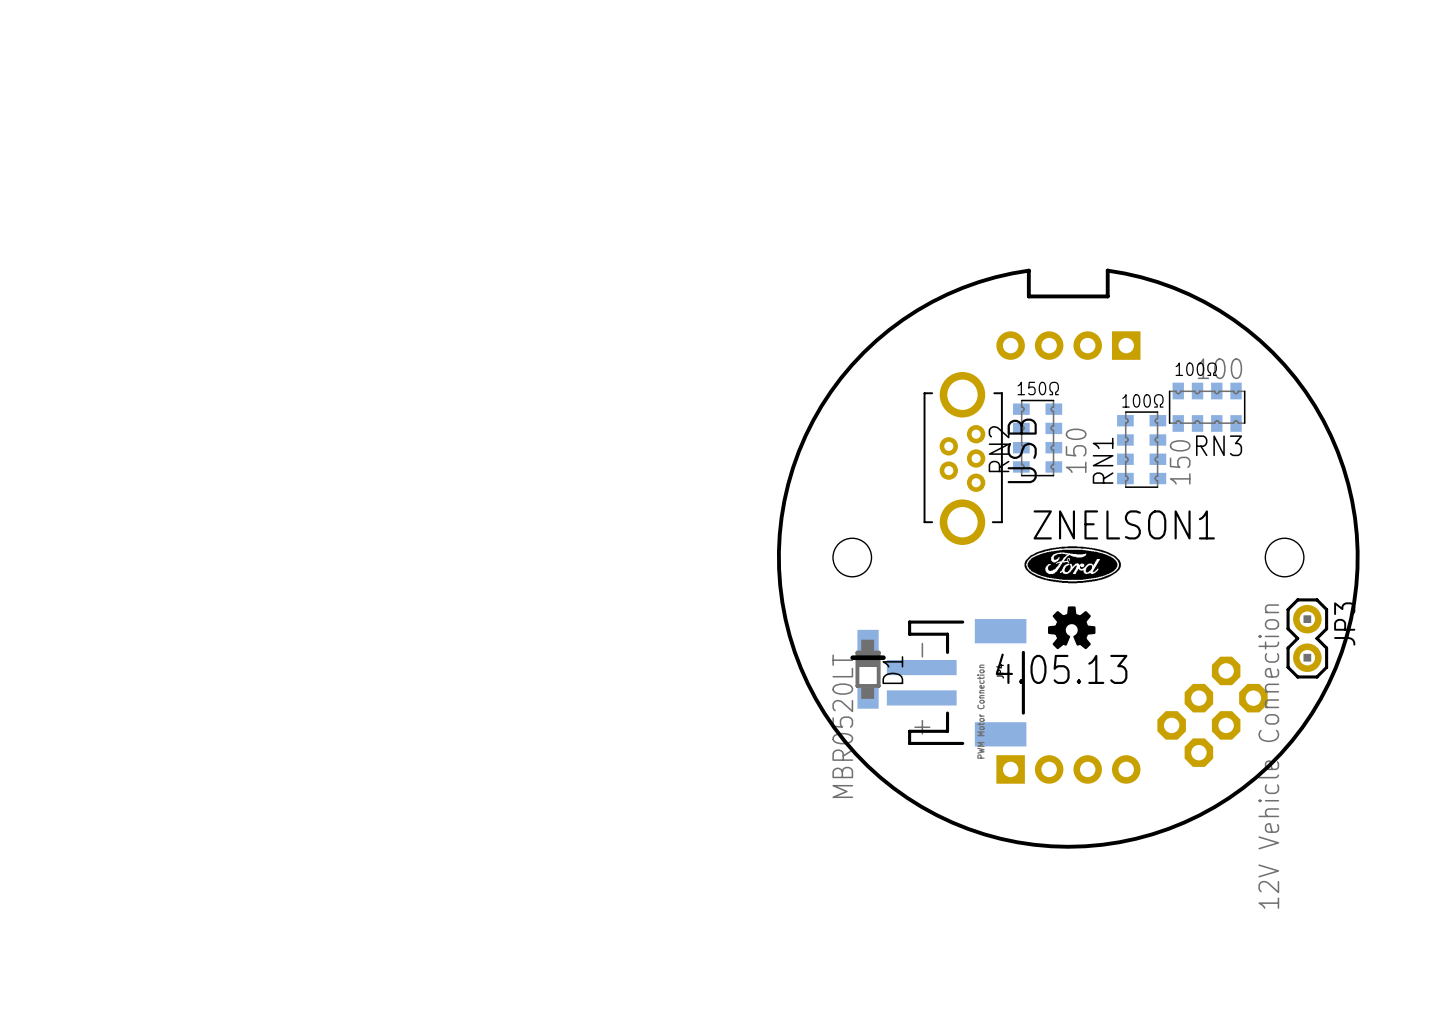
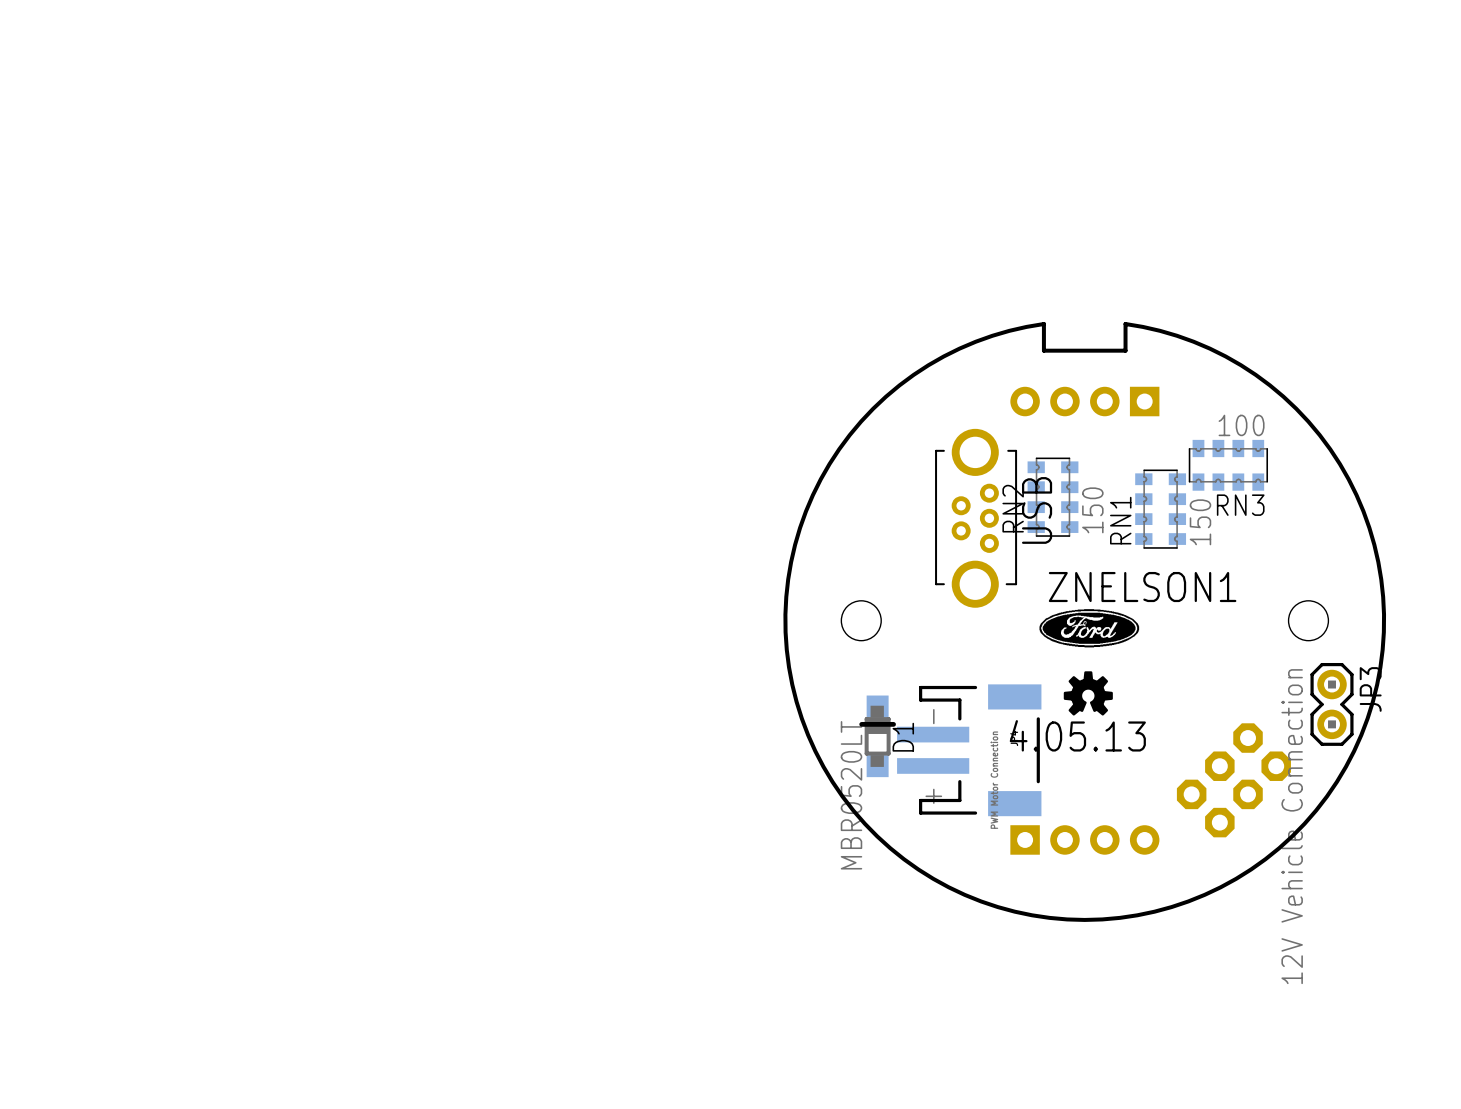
text: 100Ω (1196, 369) -> none
text: 150Ω (1038, 388) -> none
text: 100Ω (1142, 400) -> none

